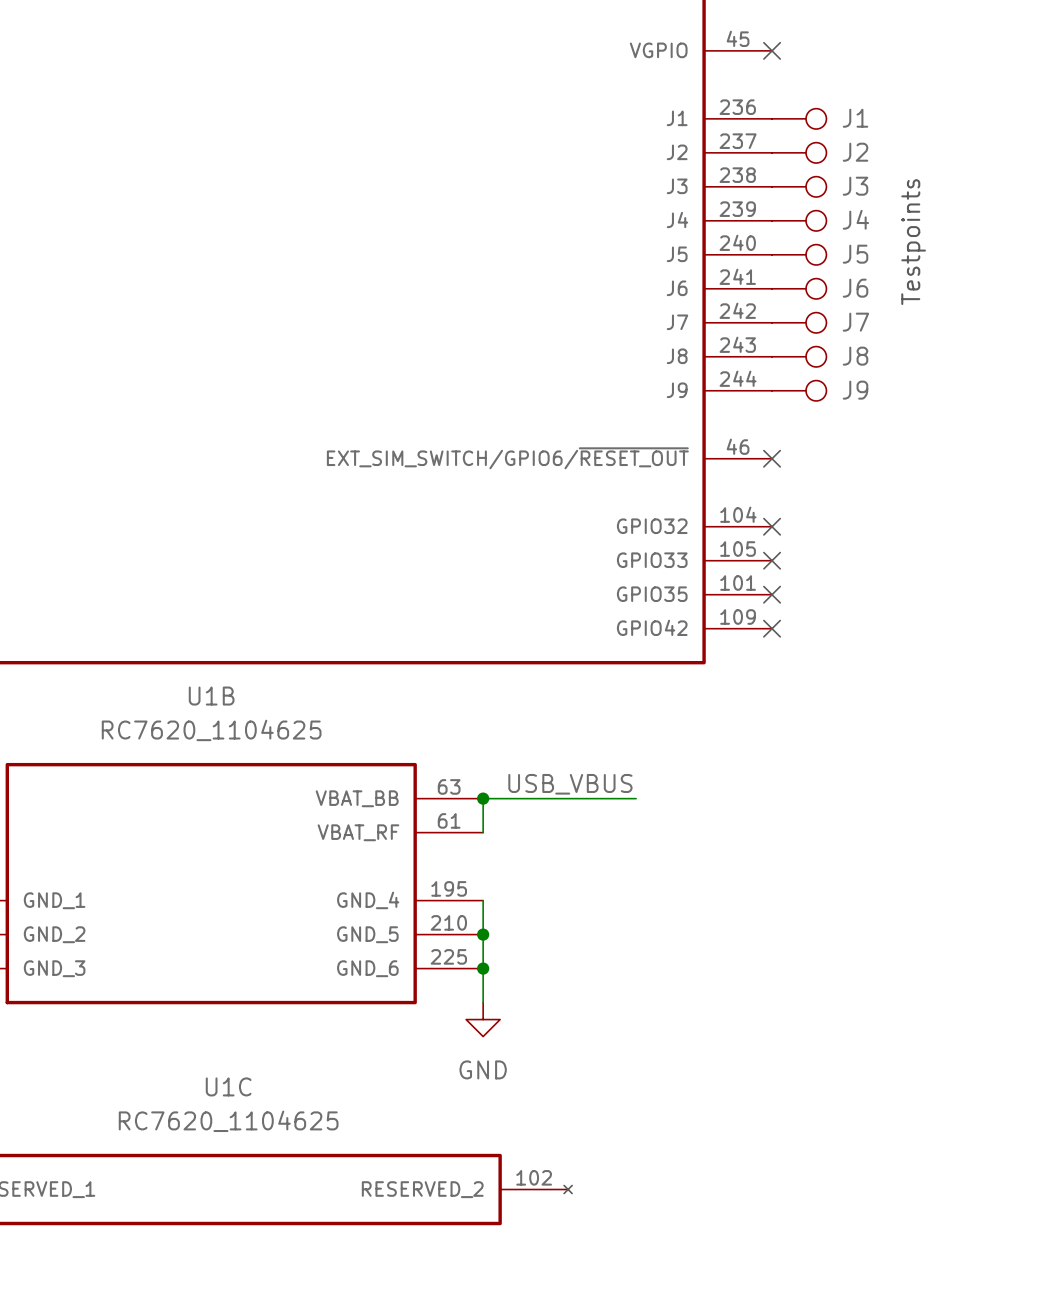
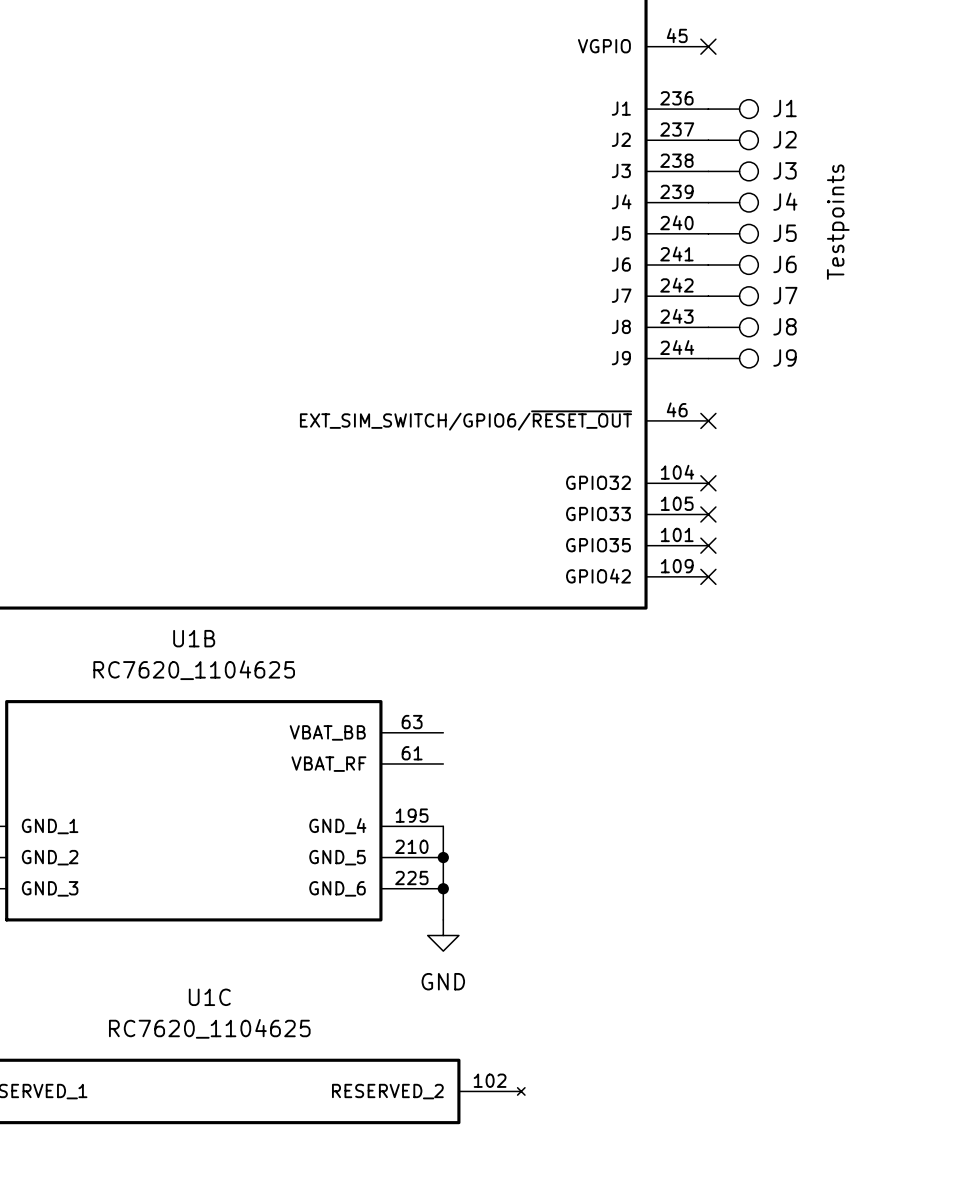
label: USB_VBUS (570, 784) -> none
junction: (483, 798) -> none
wire: (636, 798) (483, 798) (483, 832) -> none

